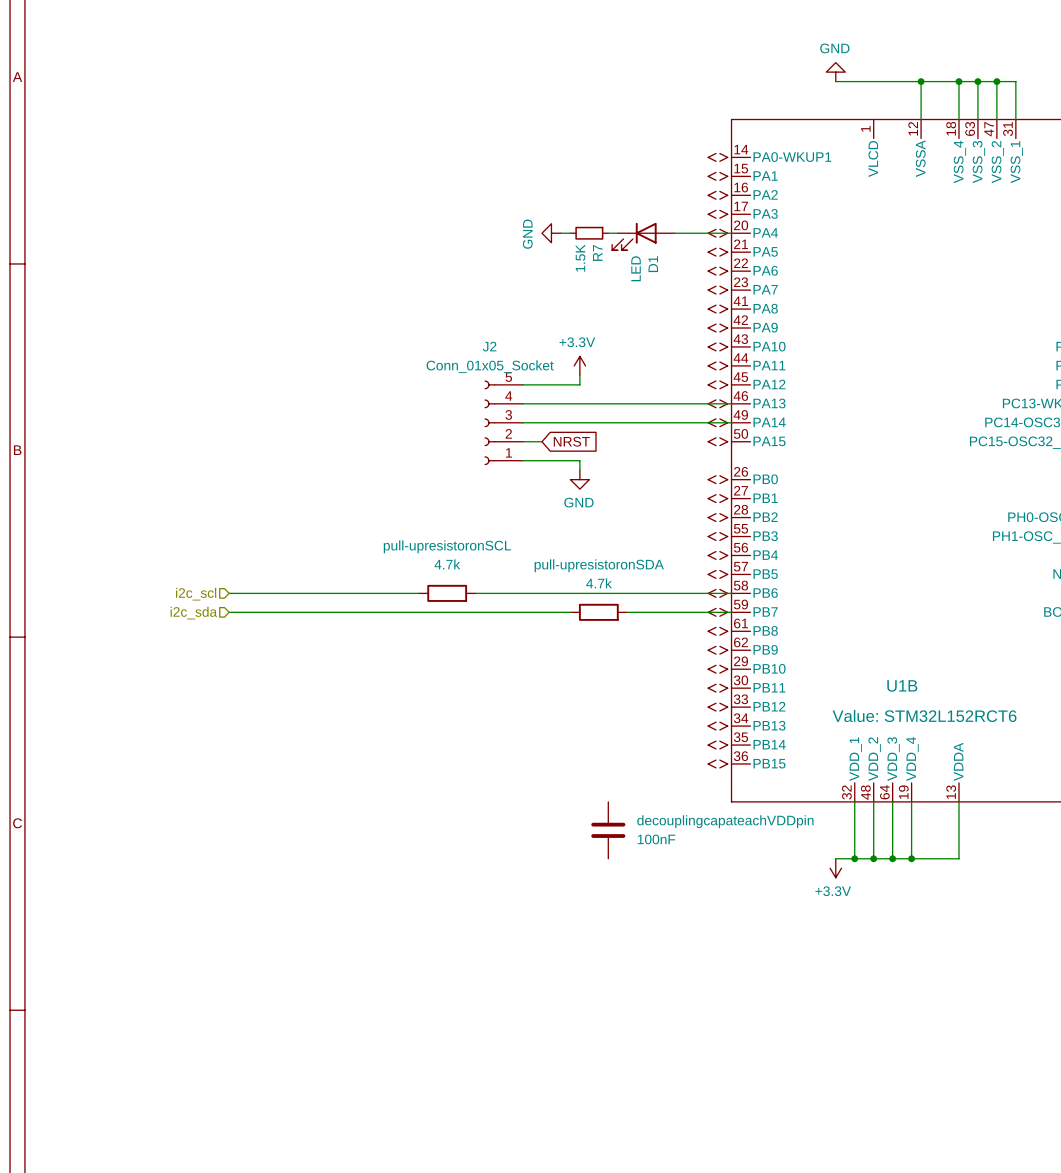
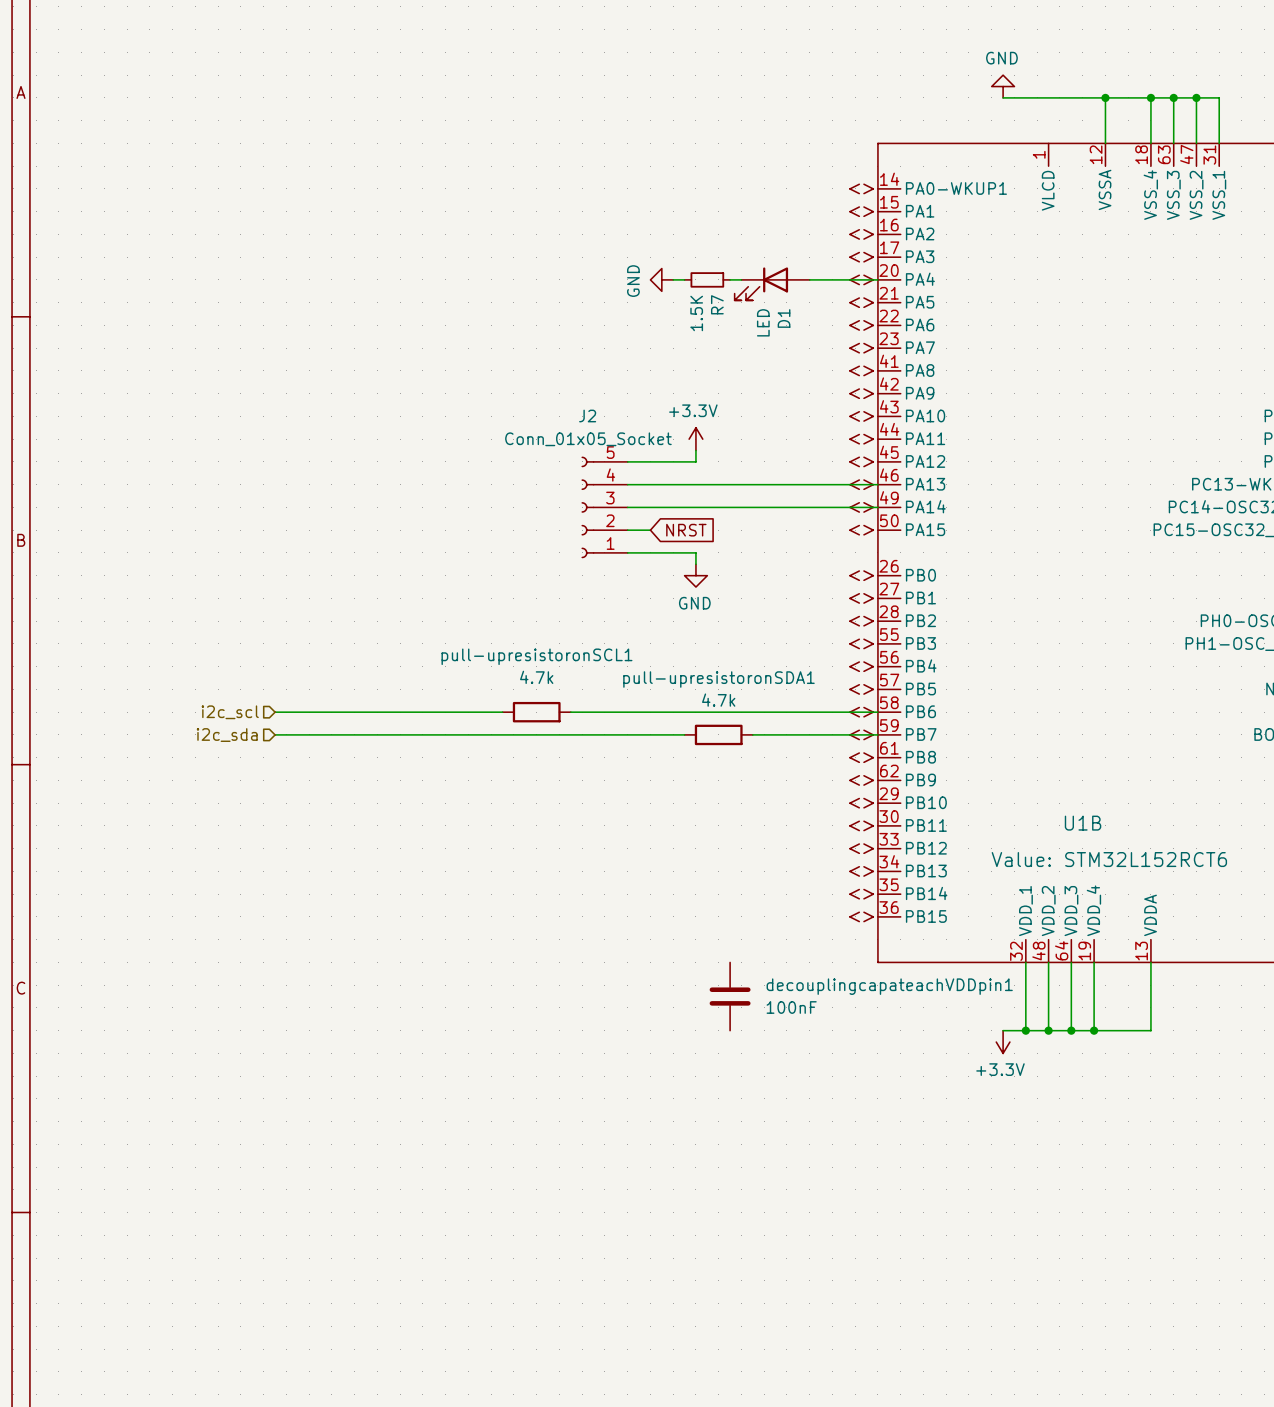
pull-upresistoronSCL name: pull-upresistoronSCL (447, 546) -> pull-upresistoronSCL1 (536, 656)
pull-upresistoronSDA name: pull-upresistoronSDA (599, 565) -> pull-upresistoronSDA1 (718, 679)
decouplingcapateachVDDpin name: decouplingcapateachVDDpin (725, 821) -> decouplingcapateachVDDpin1 (889, 986)

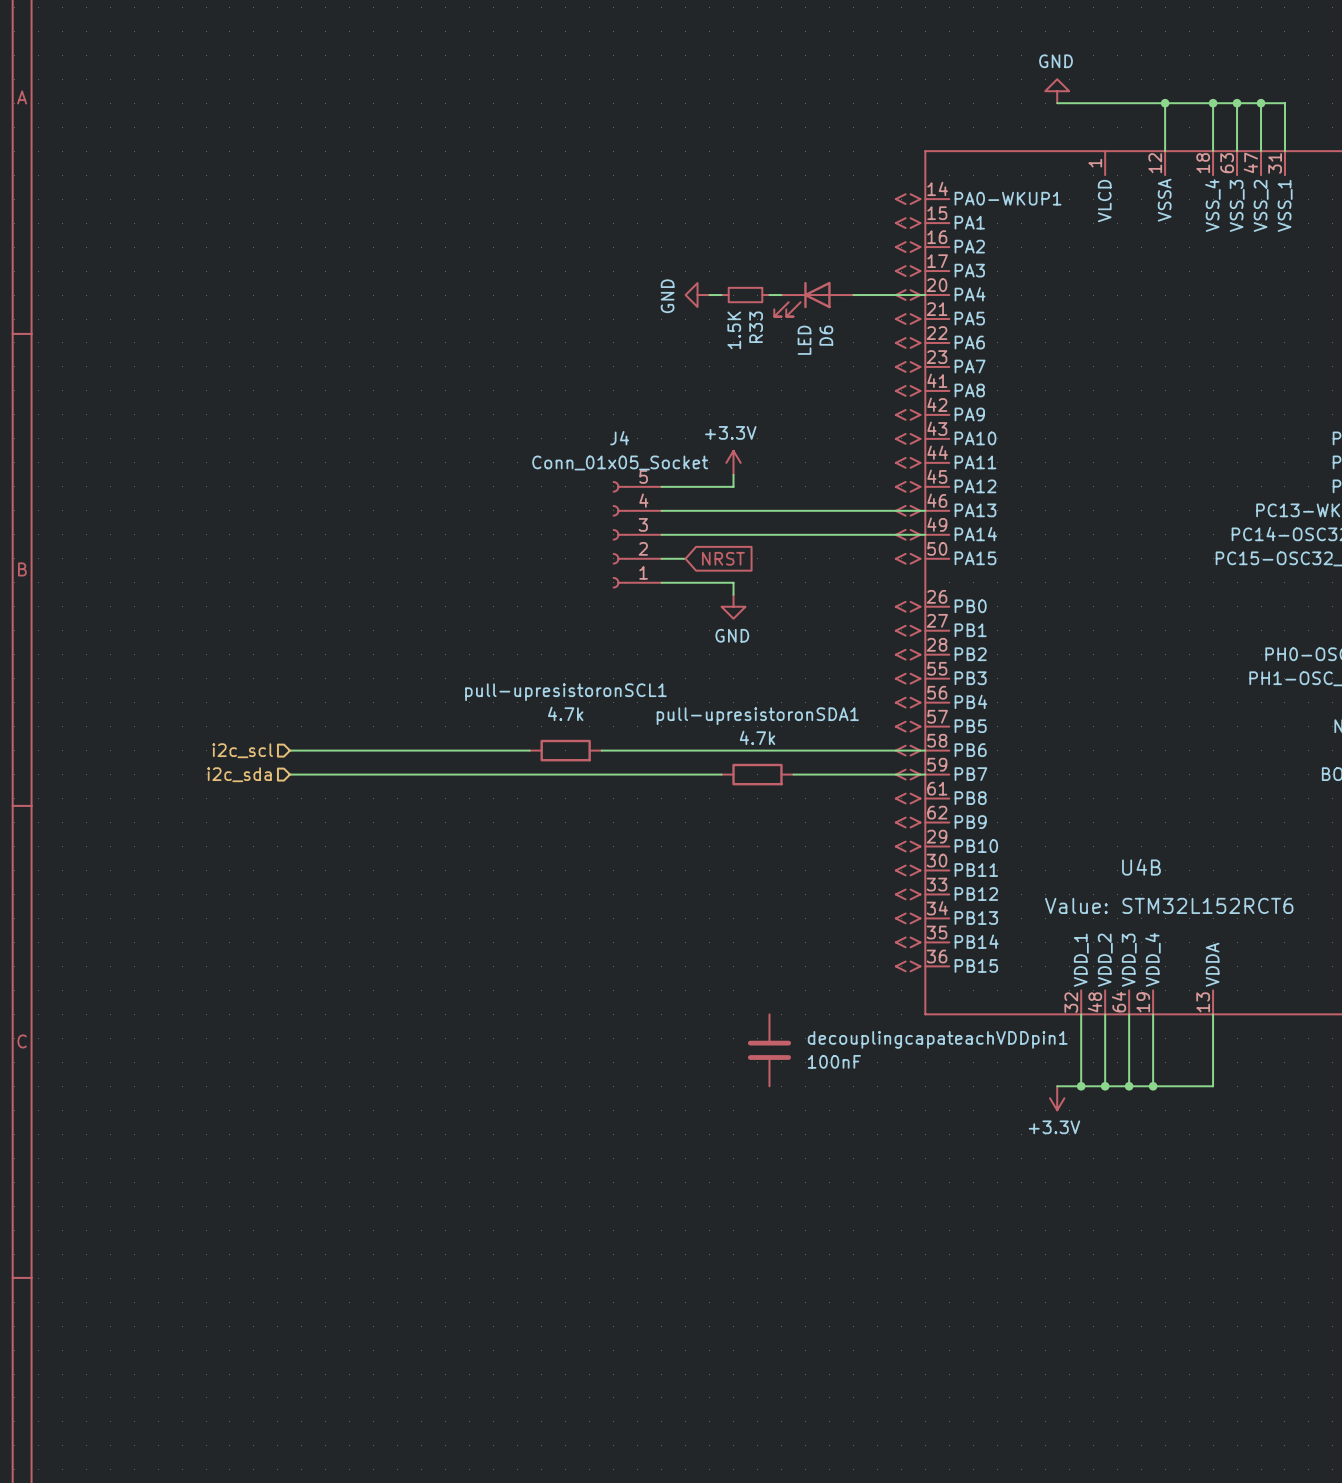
R7 name: R7 (717, 304) -> R33 (756, 327)
D1 name: D1 (784, 318) -> D6 (826, 335)
J2 name: J2 (587, 415) -> J4 (619, 438)
U1B name: U1B (1083, 823) -> U4B (1141, 867)

